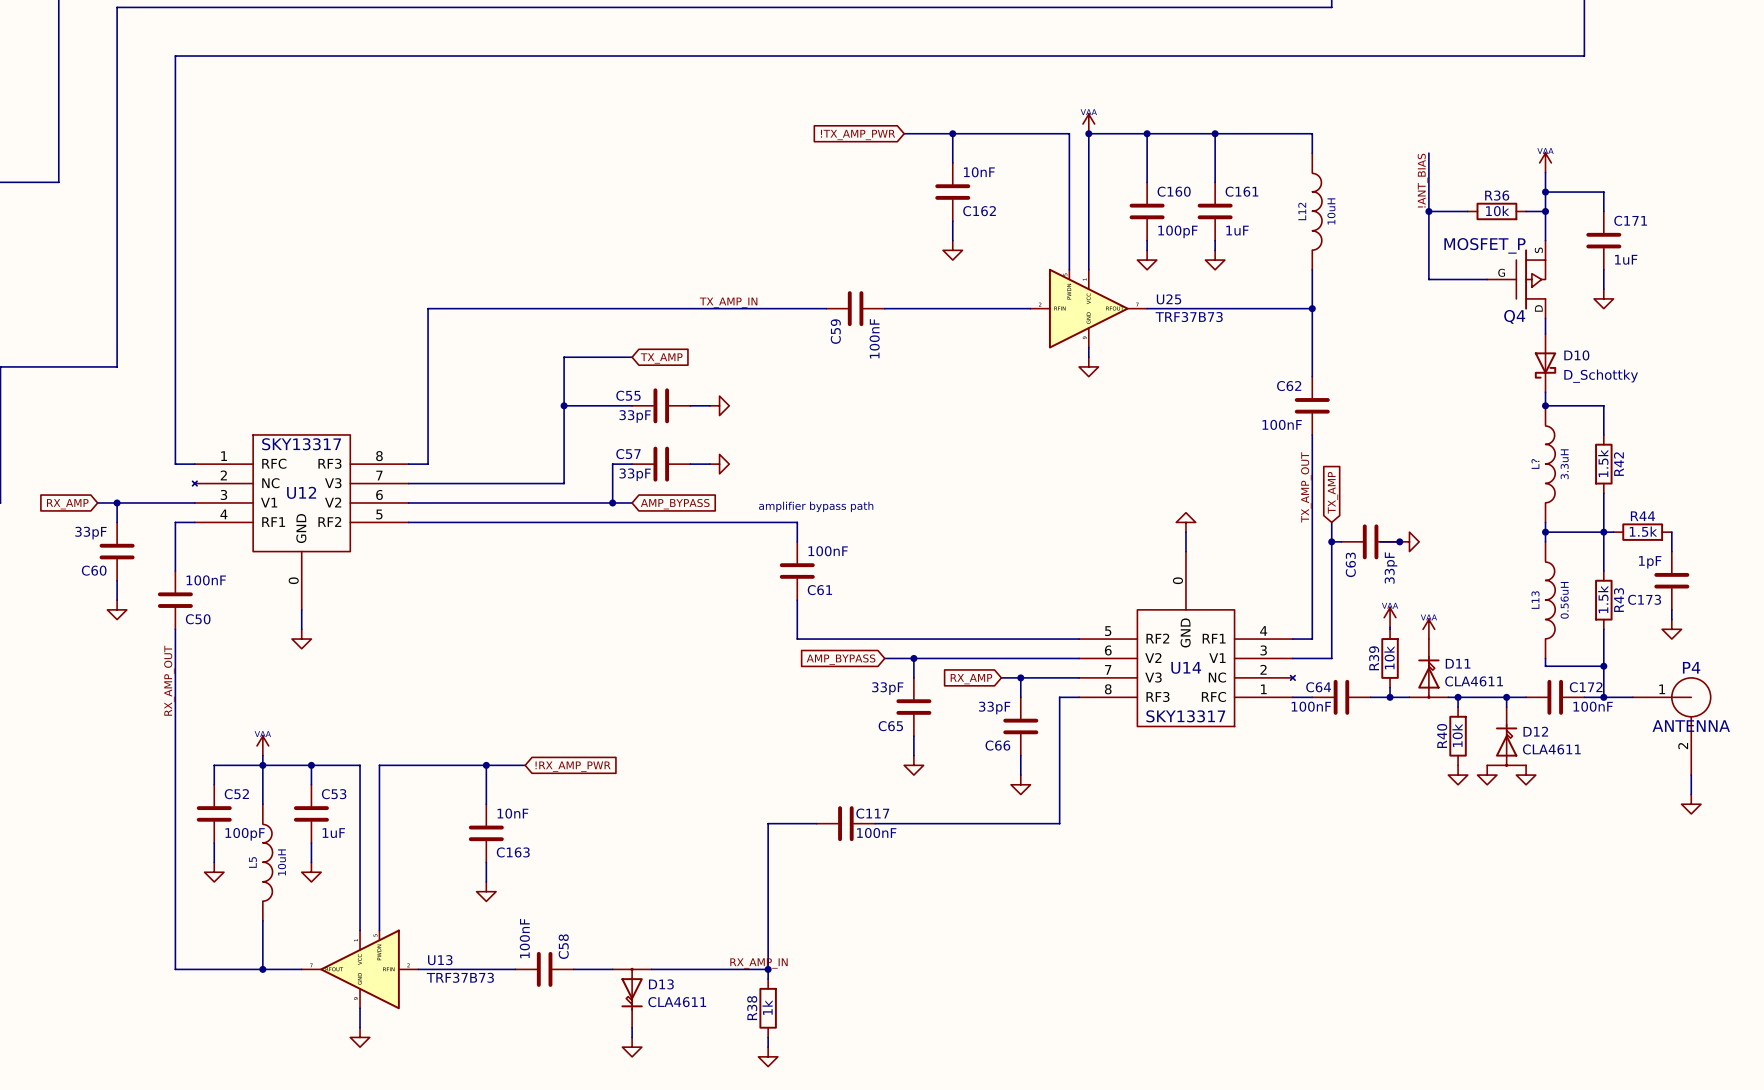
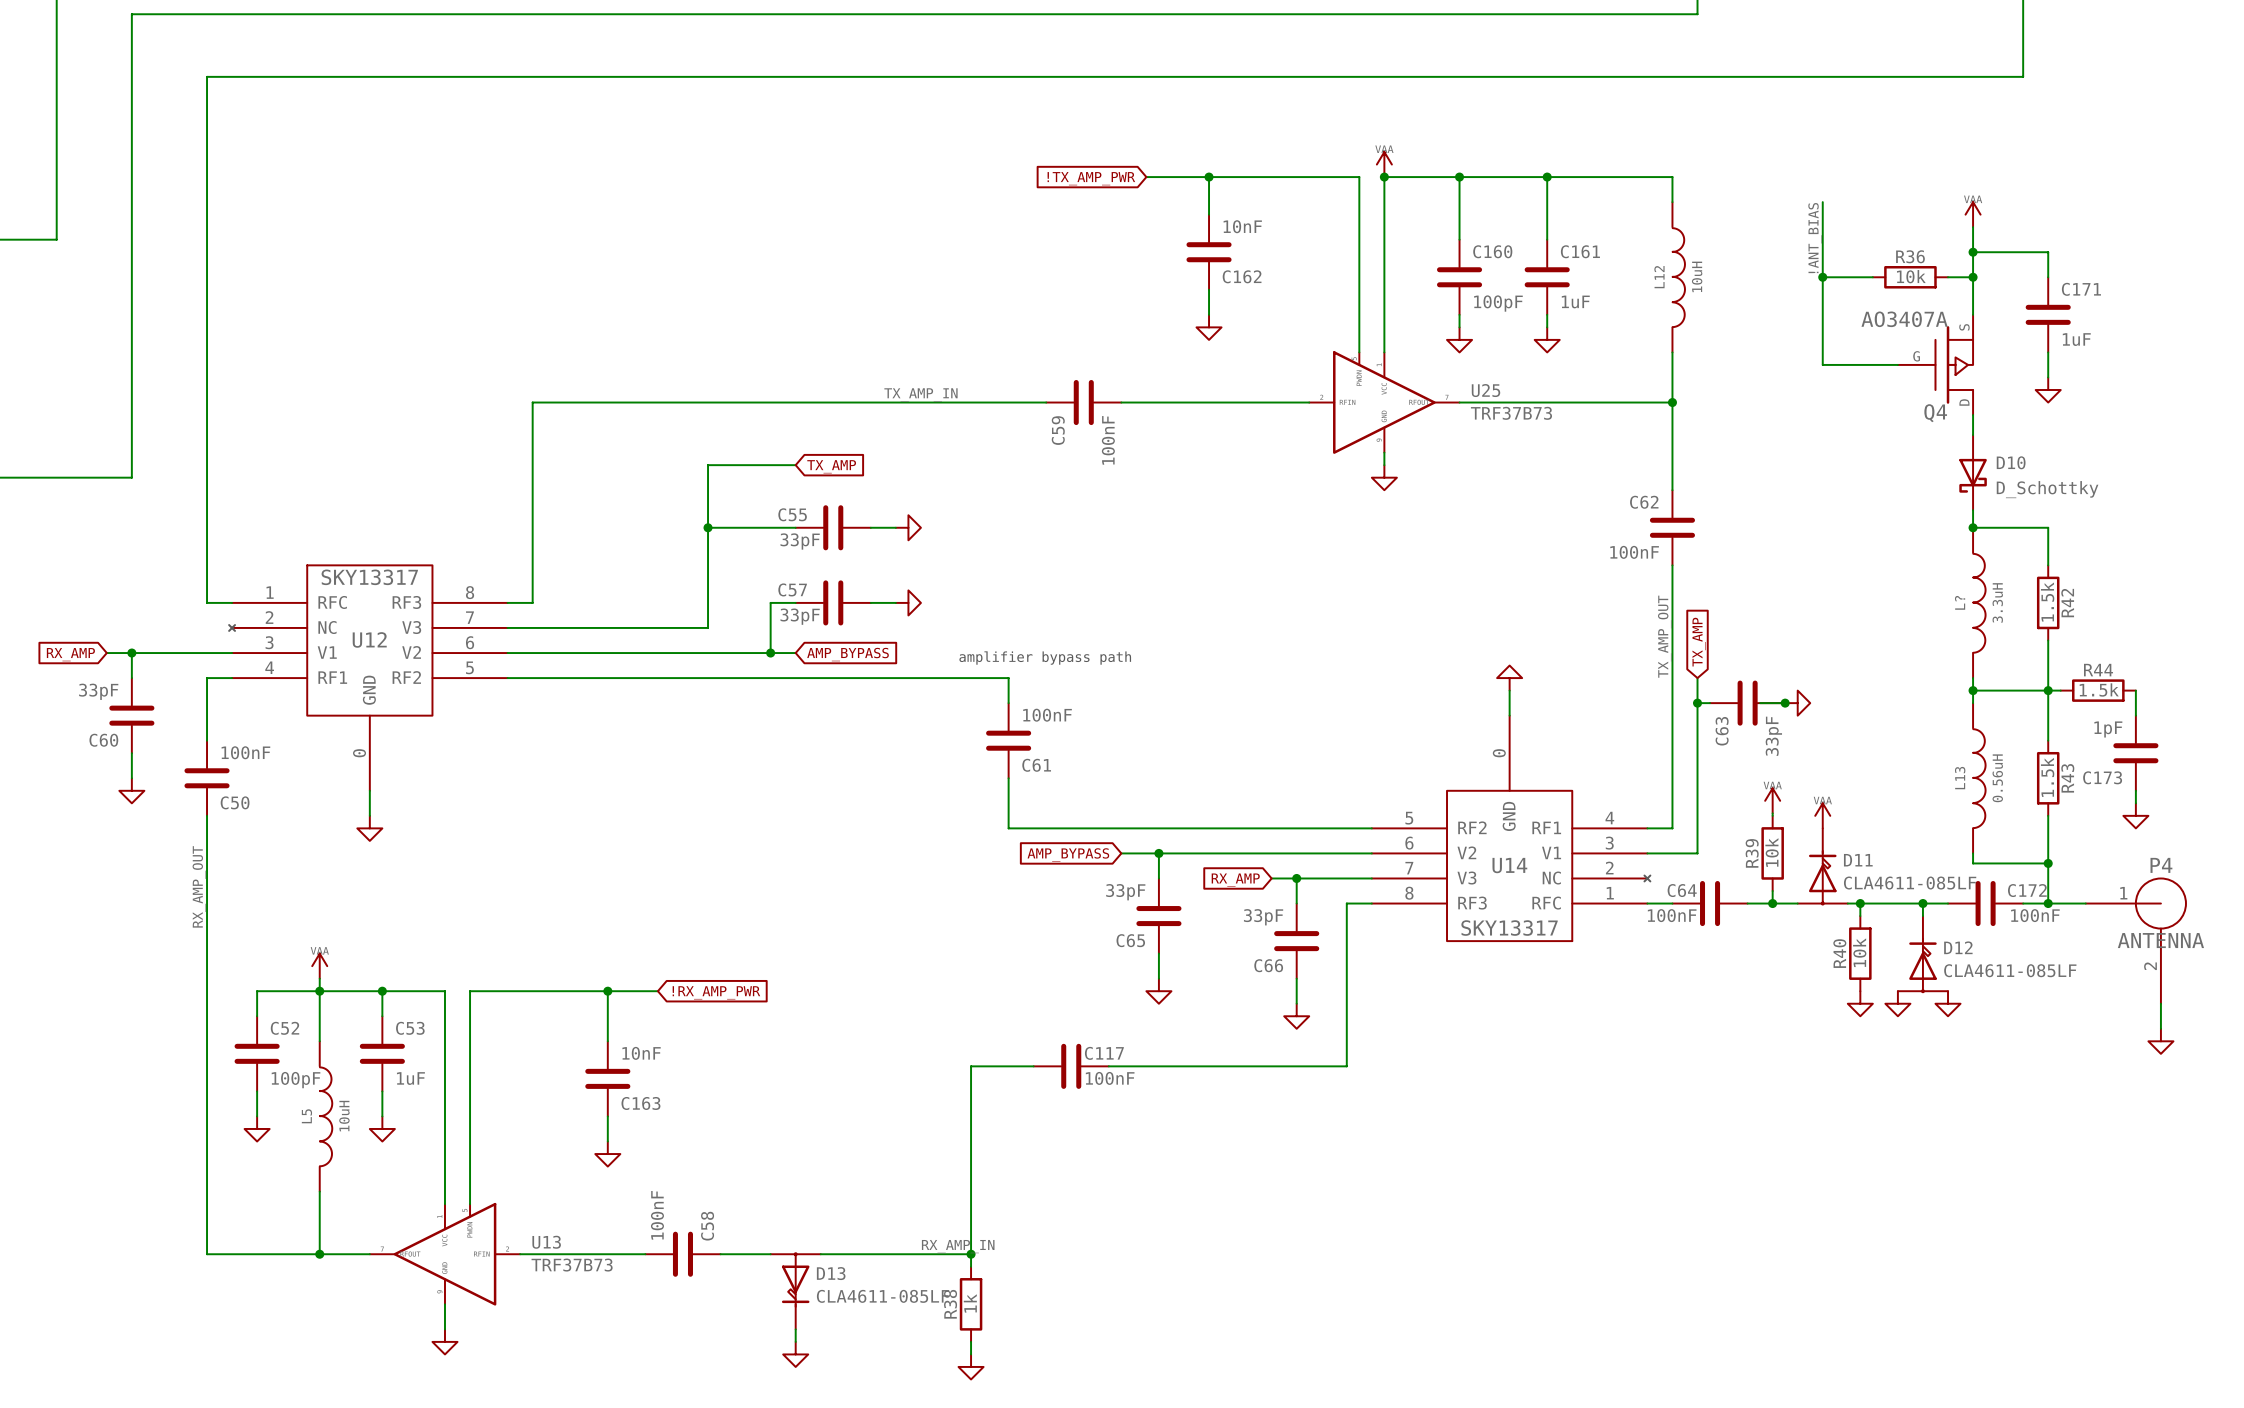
Q4 value: MOSFET_P (1484, 245) -> AO3407A (1904, 319)
D11 value: CLA4611 (1474, 681) -> CLA4611-085LF (1910, 883)
D12 value: CLA4611 (1551, 749) -> CLA4611-085LF (2010, 970)
D13 value: CLA4611 (677, 1002) -> CLA4611-085LF (883, 1296)

